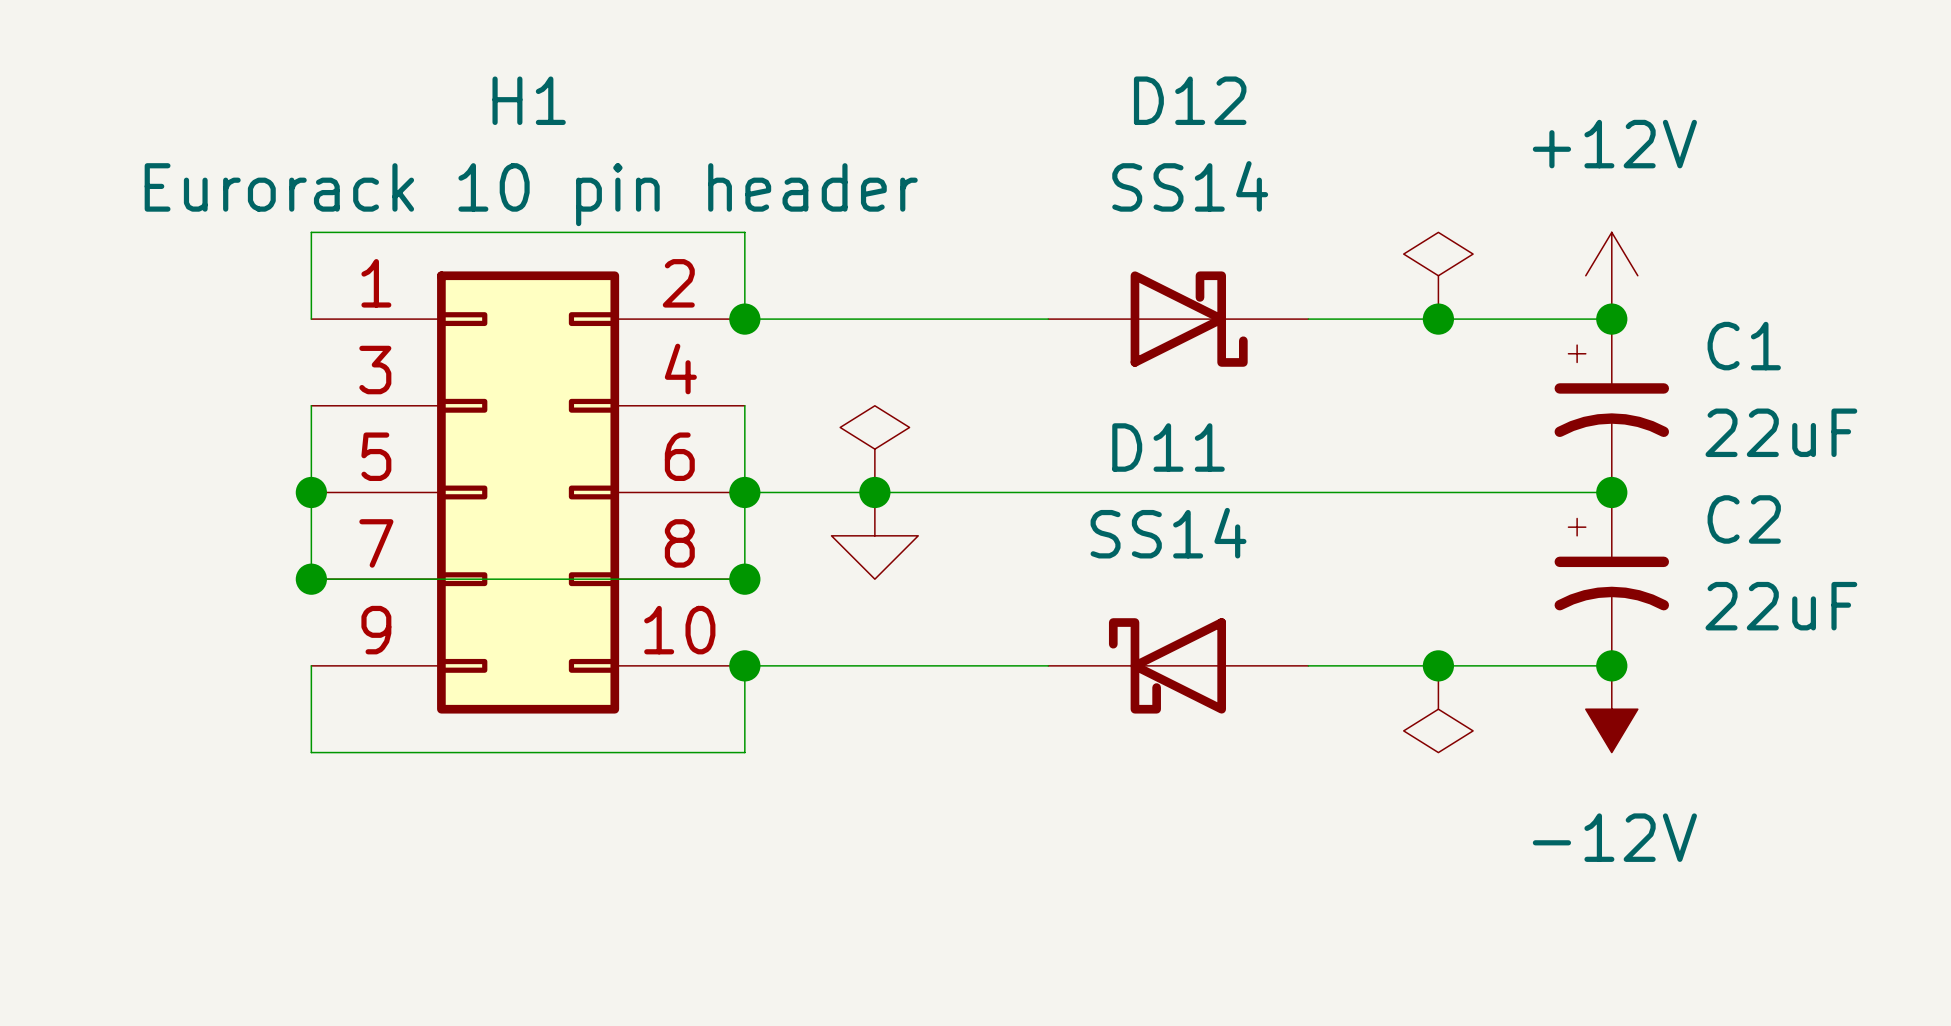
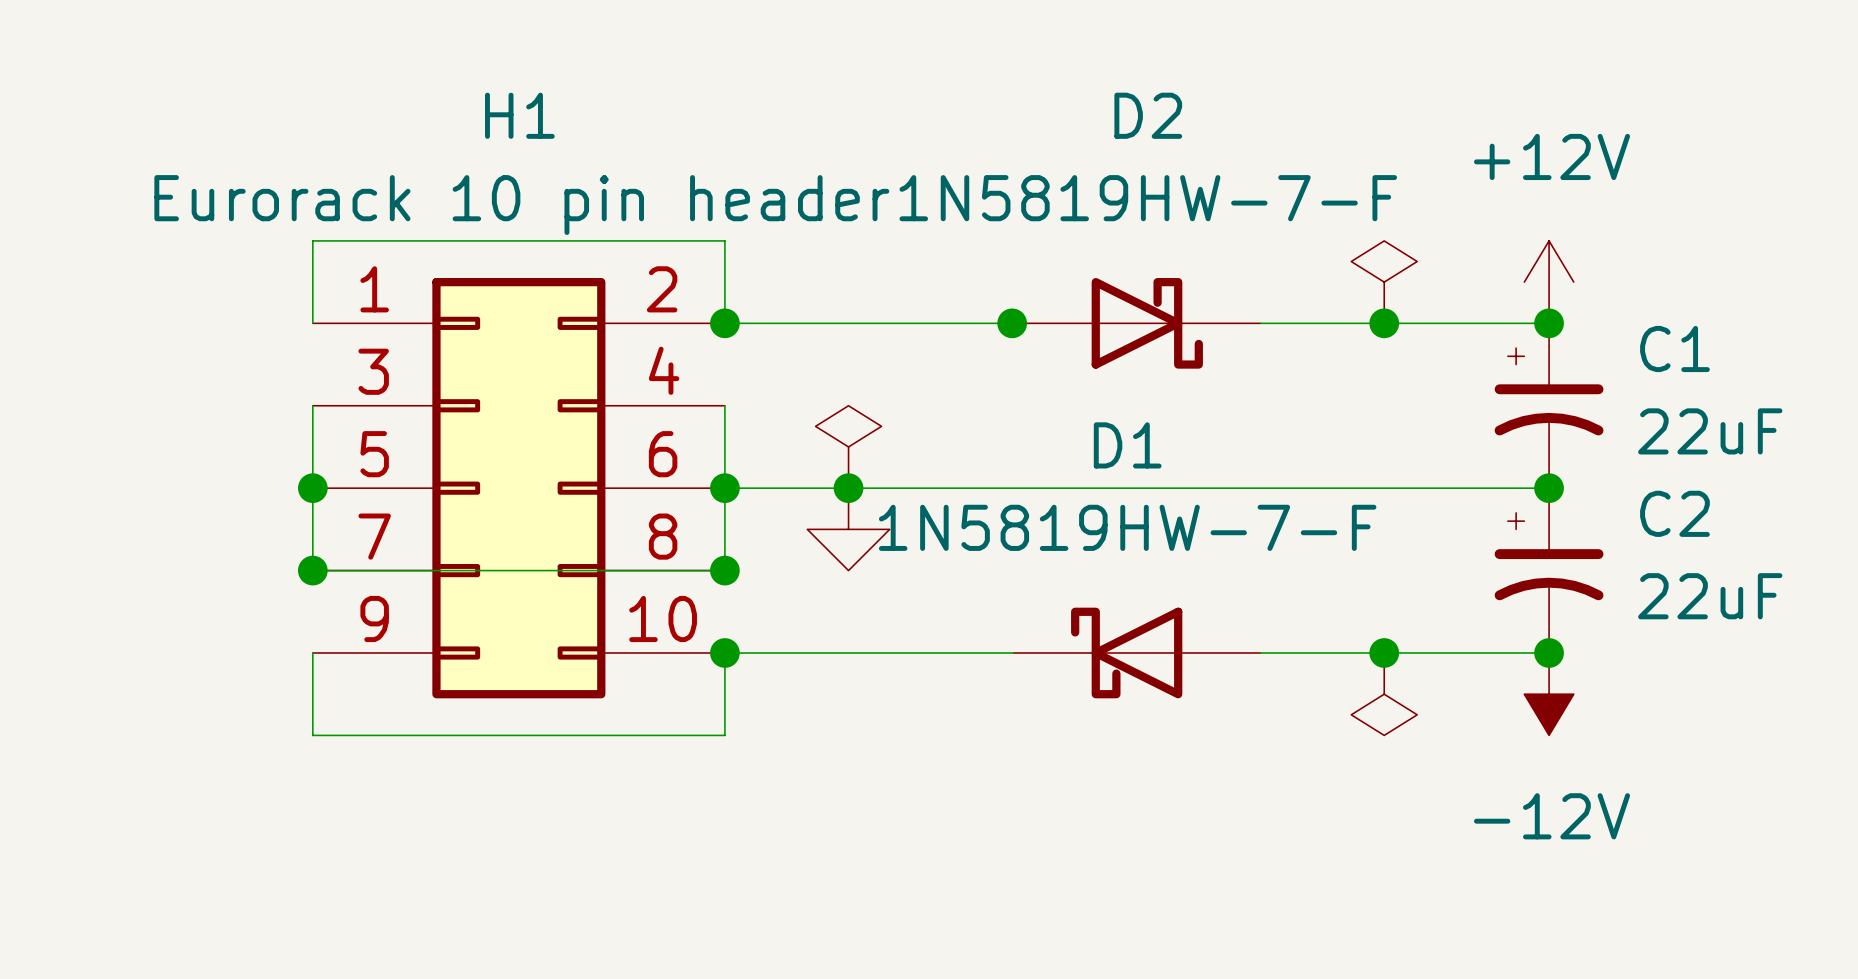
D12 name: D12 (1190, 100) -> D2 (1148, 115)
D12 value: SS14 (1190, 186) -> 1N5819HW-7-F (1148, 198)
junction: none -> (1012, 323)
D11 name: D11 (1168, 447) -> D1 (1127, 445)
D11 value: SS14 (1168, 533) -> 1N5819HW-7-F (1127, 527)

